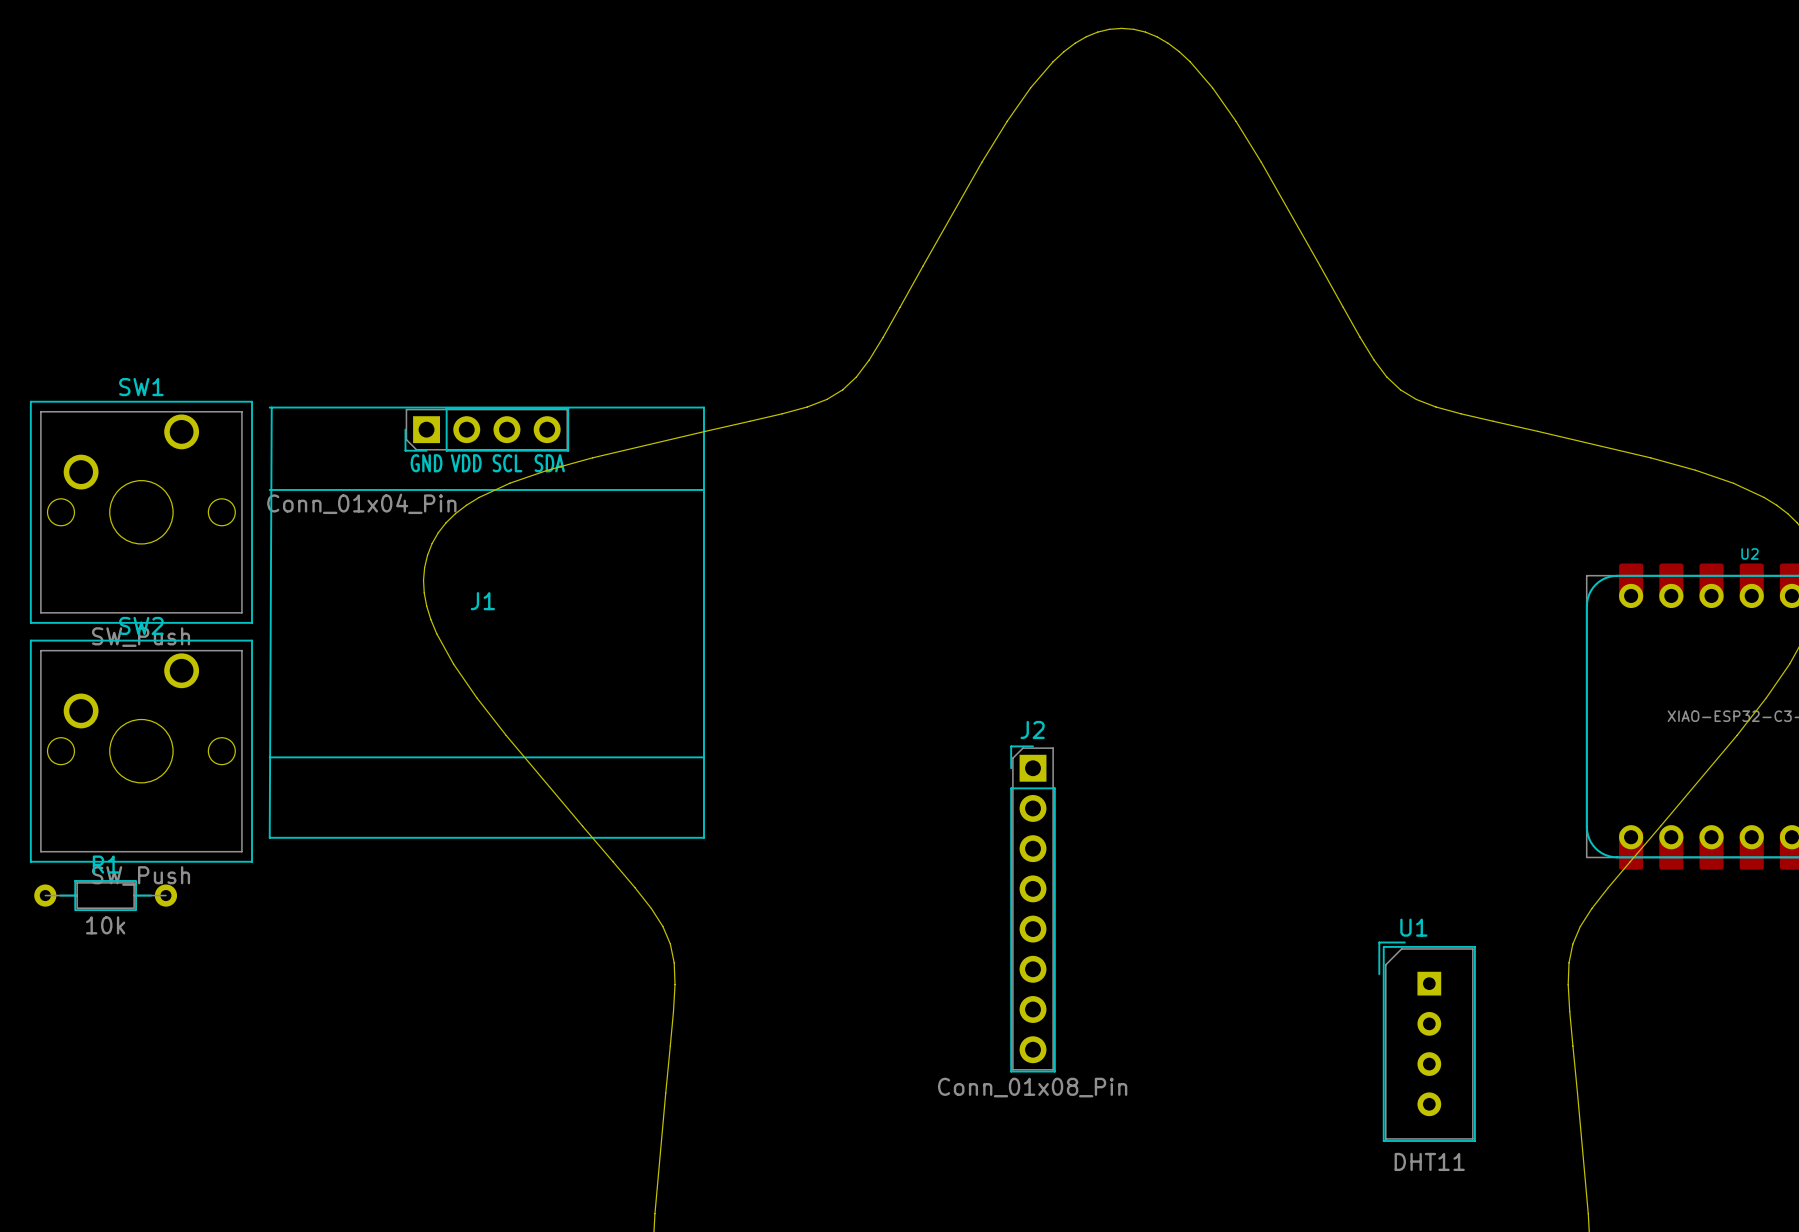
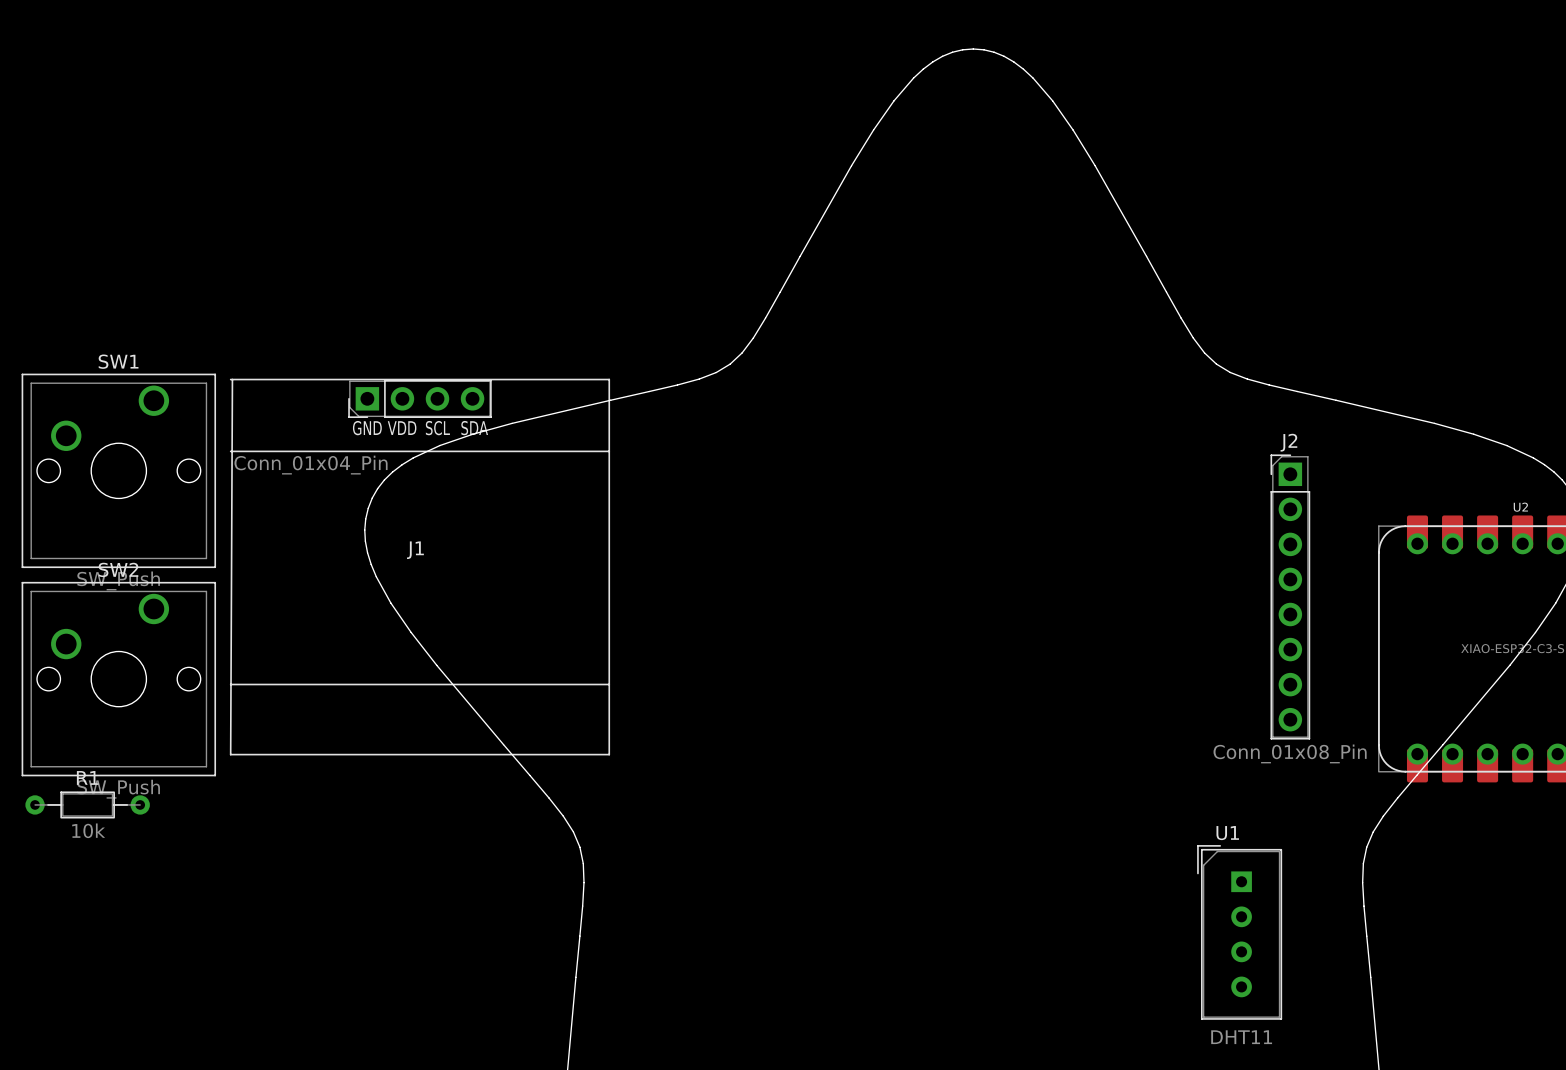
J2 position: (1033, 908) -> (1290, 596)

